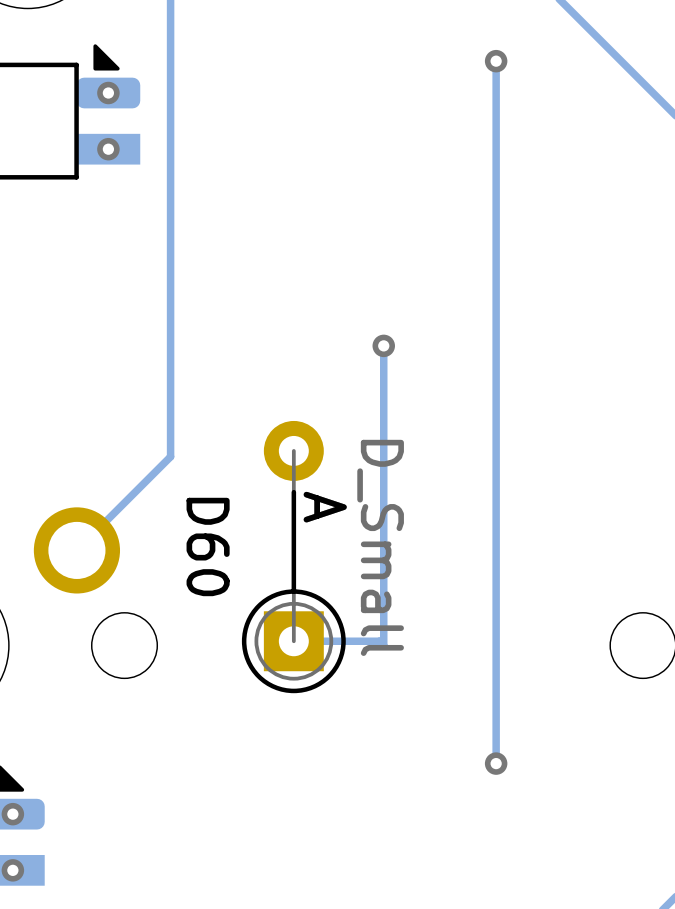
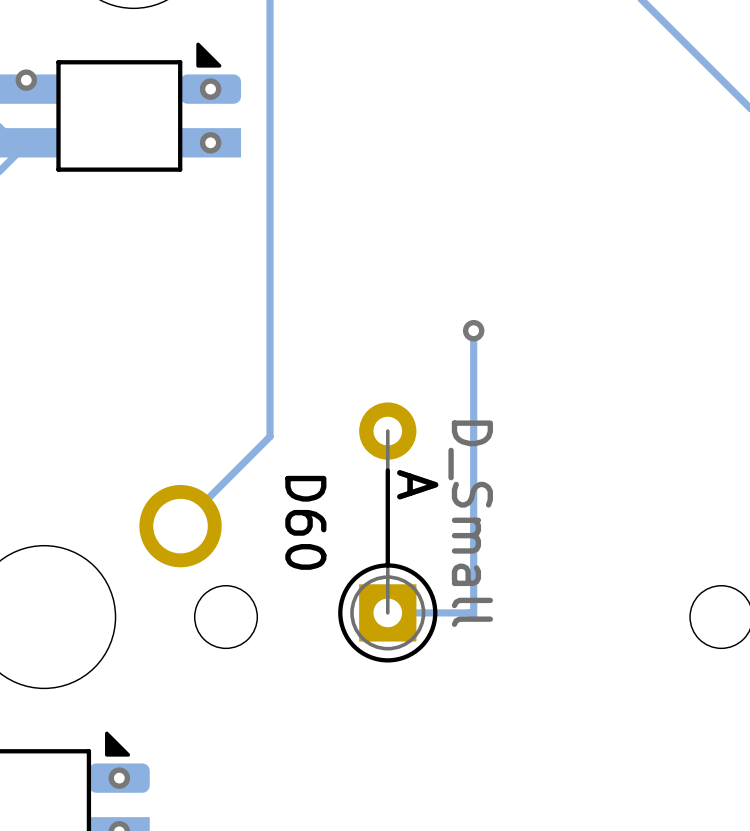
track: (496, 61) (496, 763) -> none
via: (496, 61) -> none
via: (496, 763) -> none

